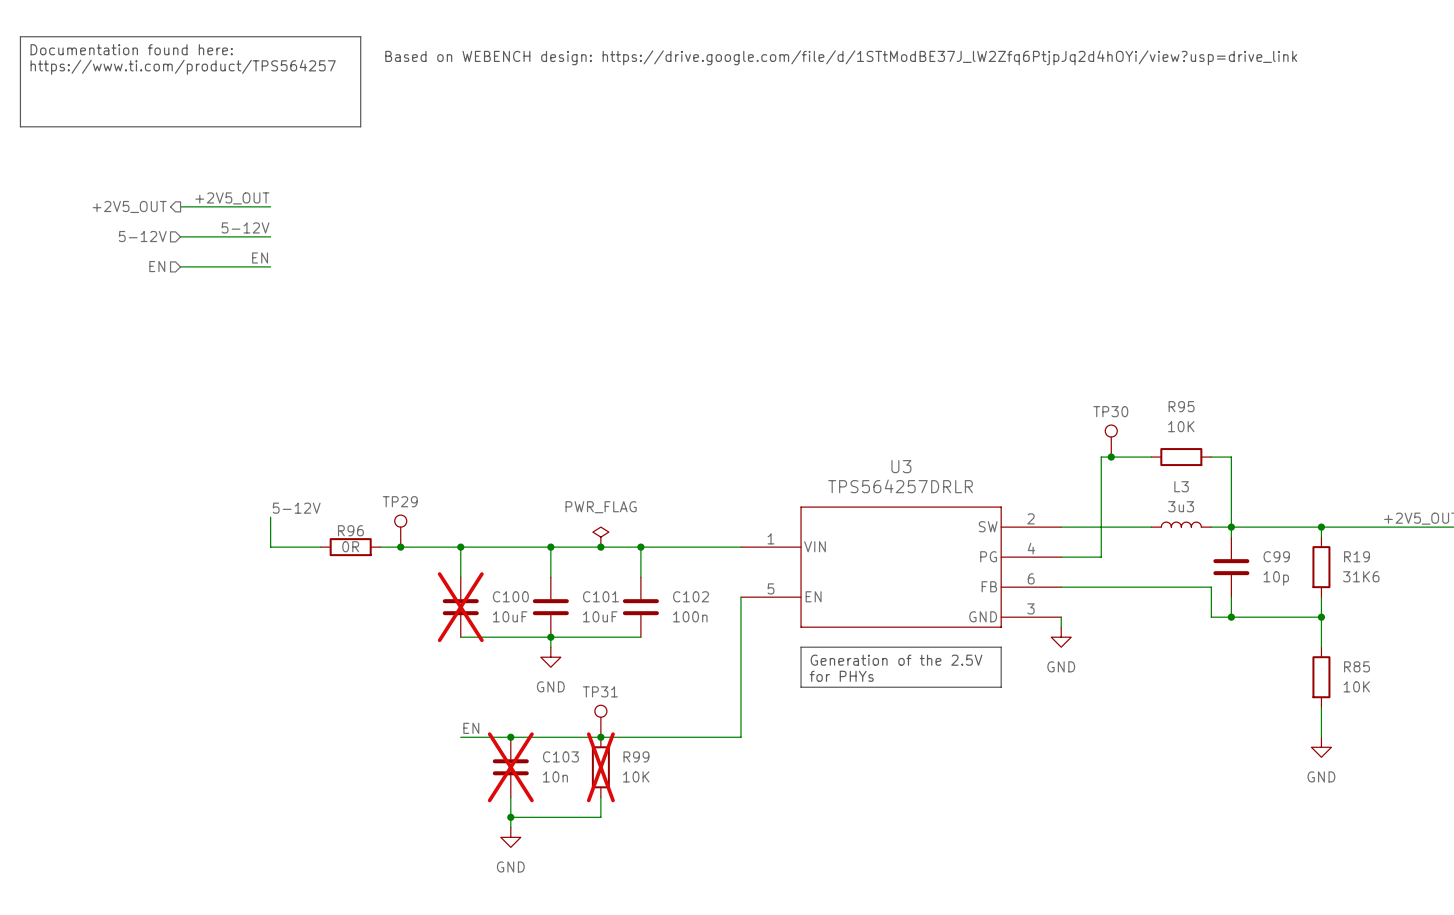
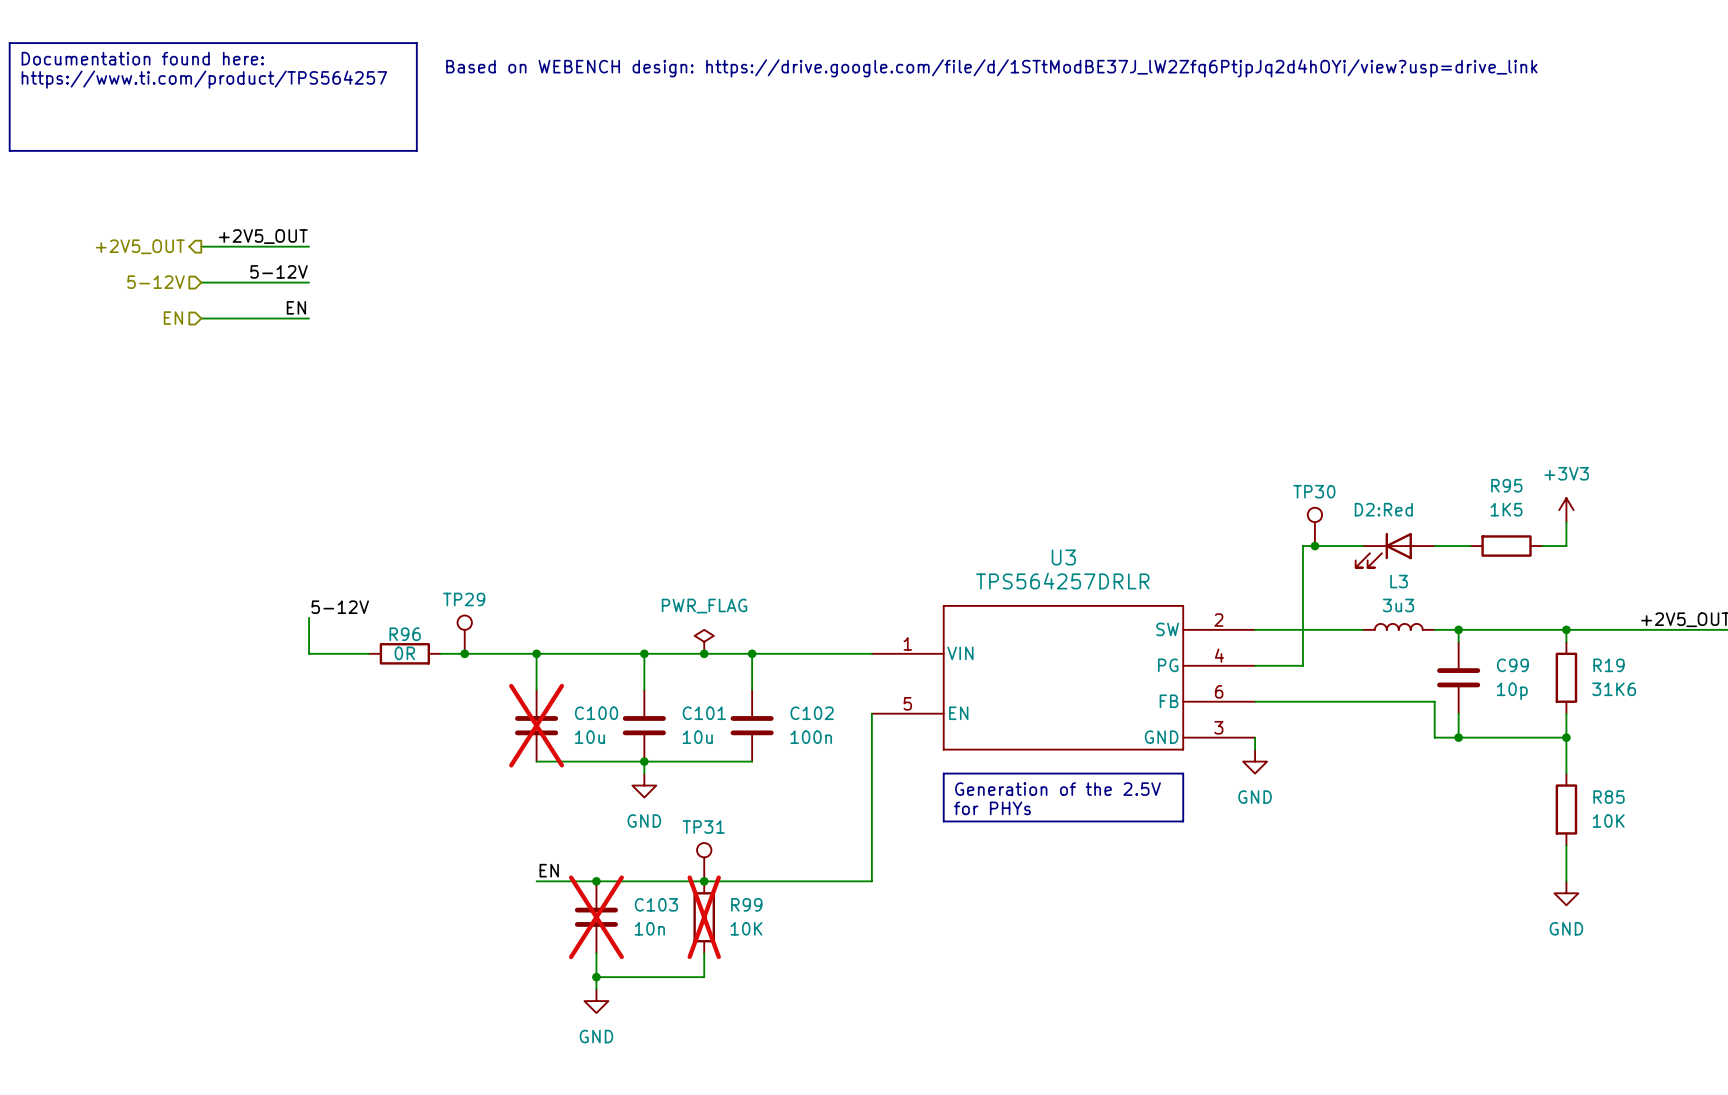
R95 value: 10K (1181, 426) -> 1K5 (1506, 509)
power symbol: none -> +3V3 (1566, 510)
wire: none -> (1566, 522) (1566, 546) (1542, 546)
R95 position: (1181, 457) -> (1506, 546)
wire: (1231, 457) (1231, 527) -> (1458, 546) (1470, 546)
part: none -> (1395, 550)
C100 value: 10uF (510, 616) -> 10u (589, 737)
C101 value: 10uF (600, 616) -> 10u (697, 737)

